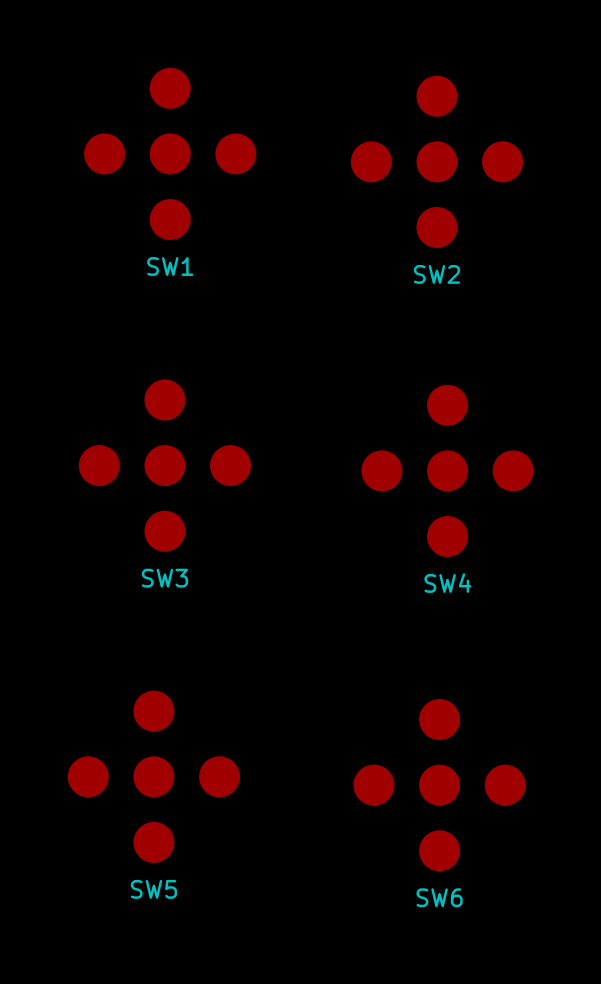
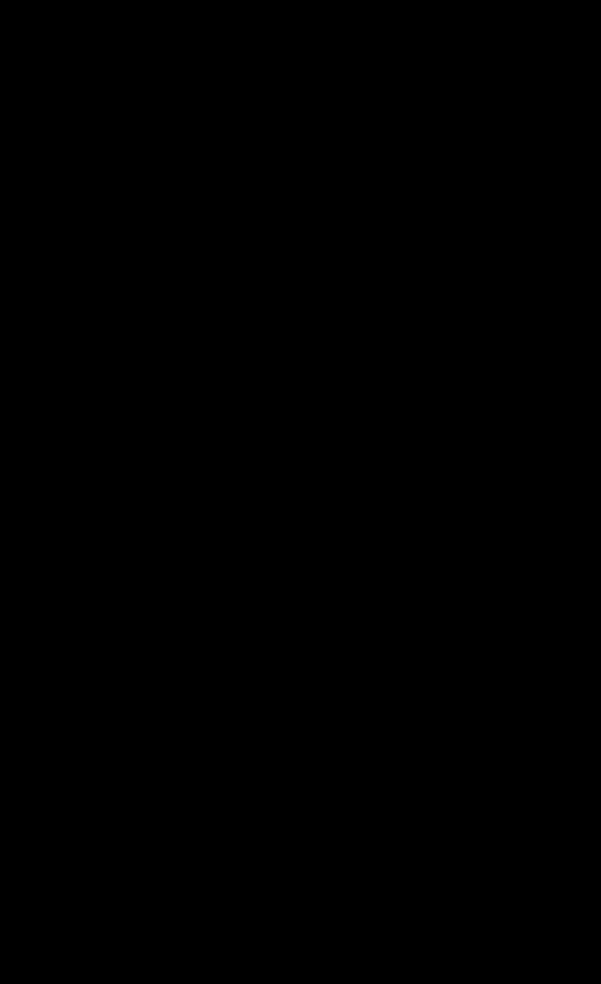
SW1: (170, 153) -> none
SW2: (436, 161) -> none
SW3: (164, 465) -> none
SW4: (447, 470) -> none
SW5: (153, 776) -> none
SW6: (439, 785) -> none

